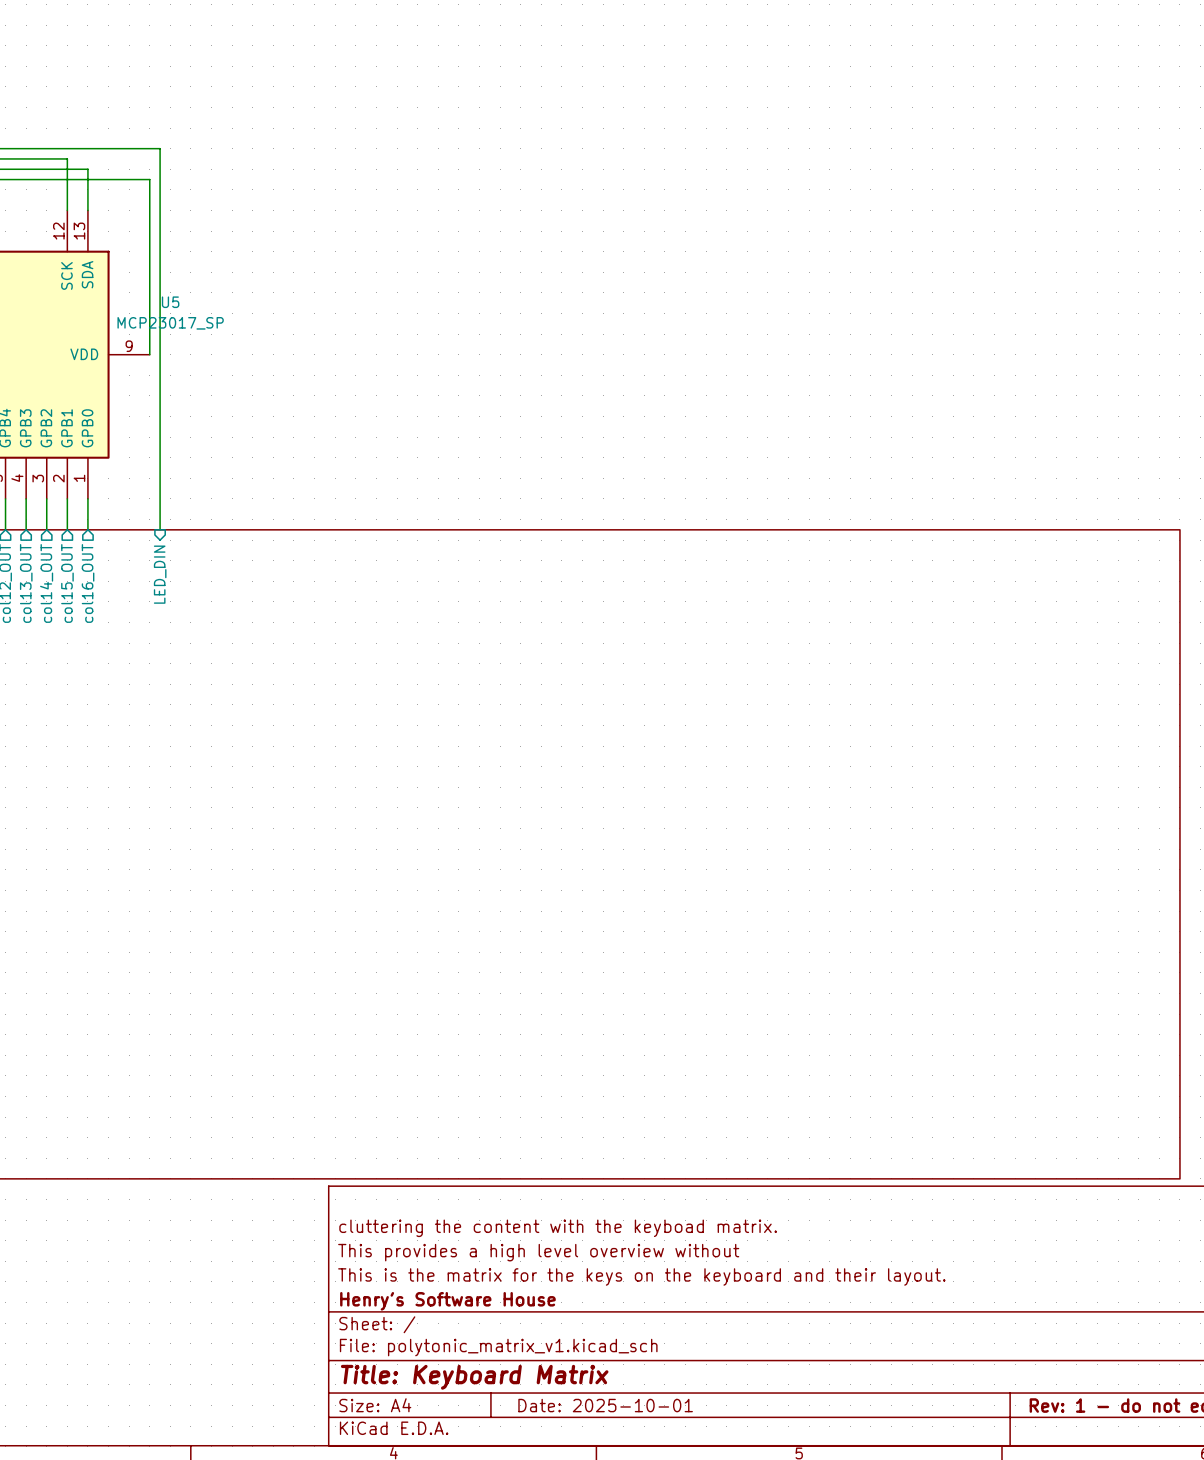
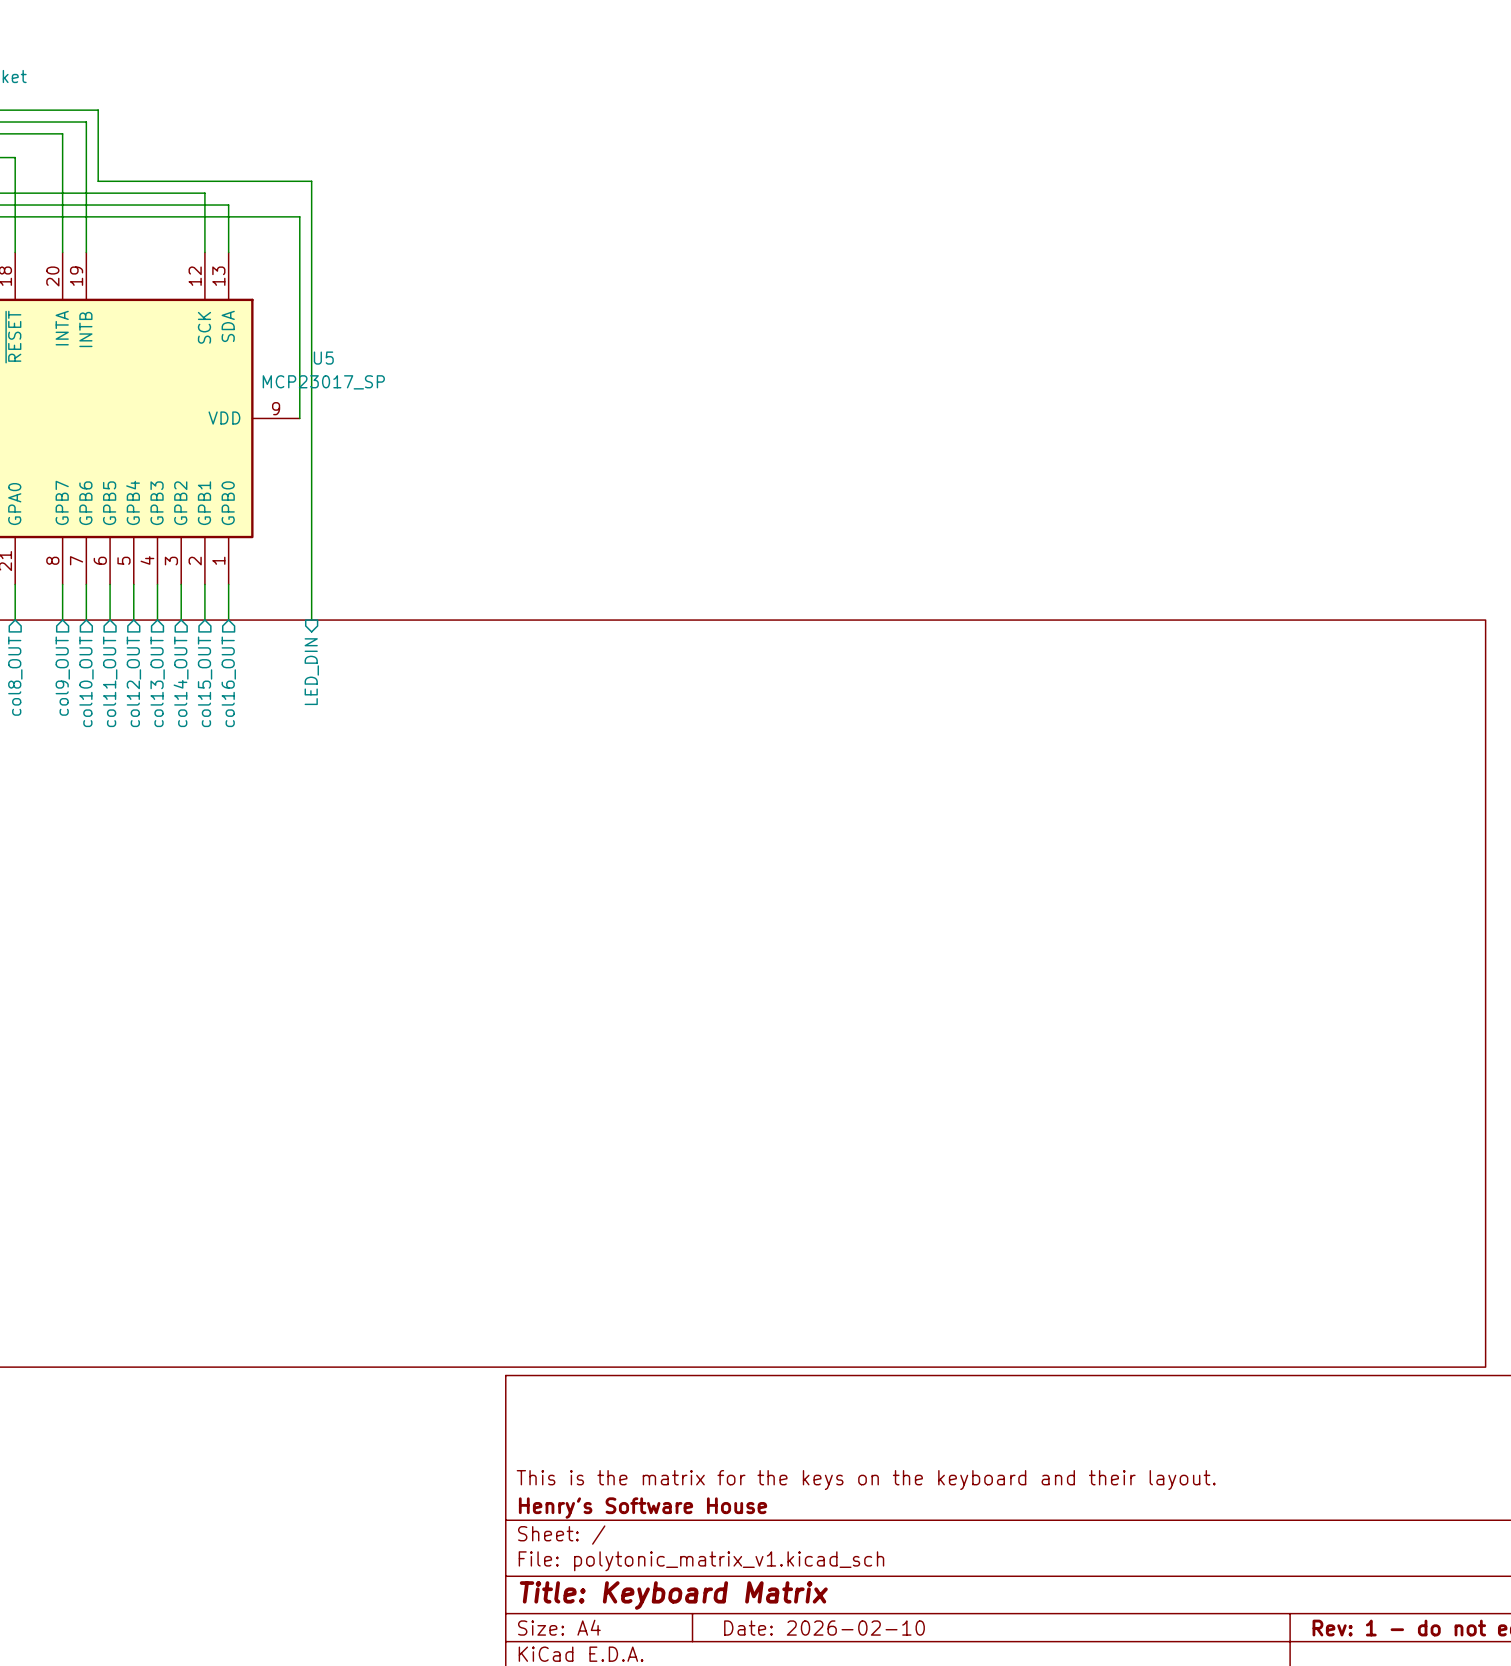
title block: cluttering the content with the keyboad matrix. (558, 1228) -> none
title block: This provides a high level overview without (538, 1252) -> none
title block: Date: 2025-10-01 (605, 1405) -> Date: 2026-02-10 (824, 1628)

